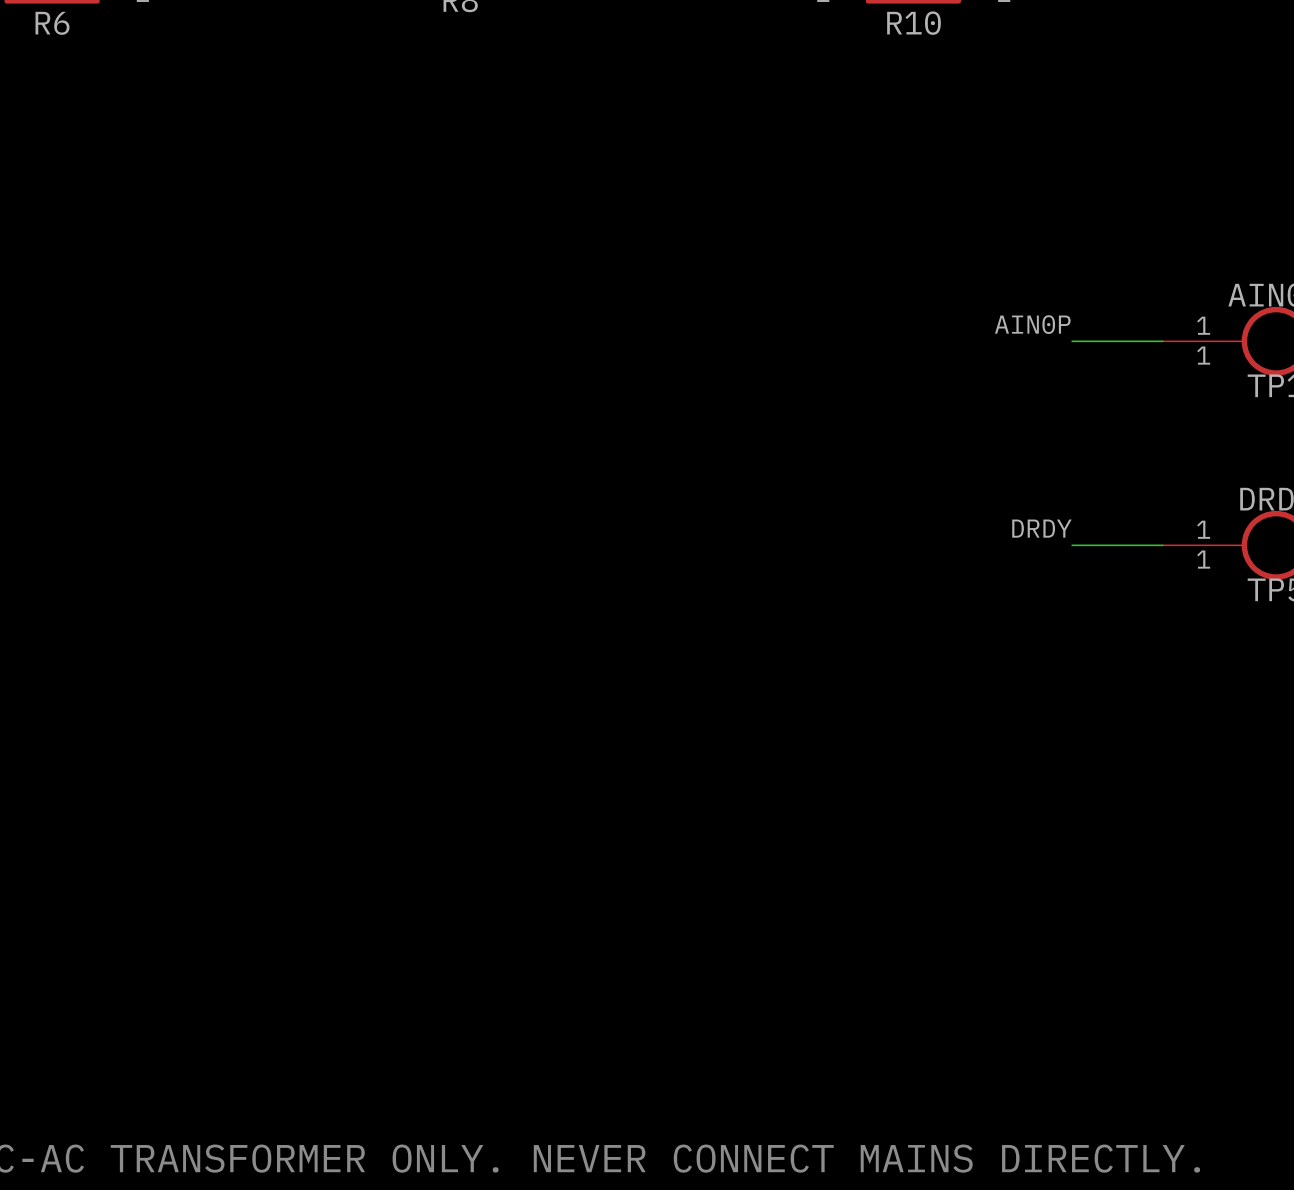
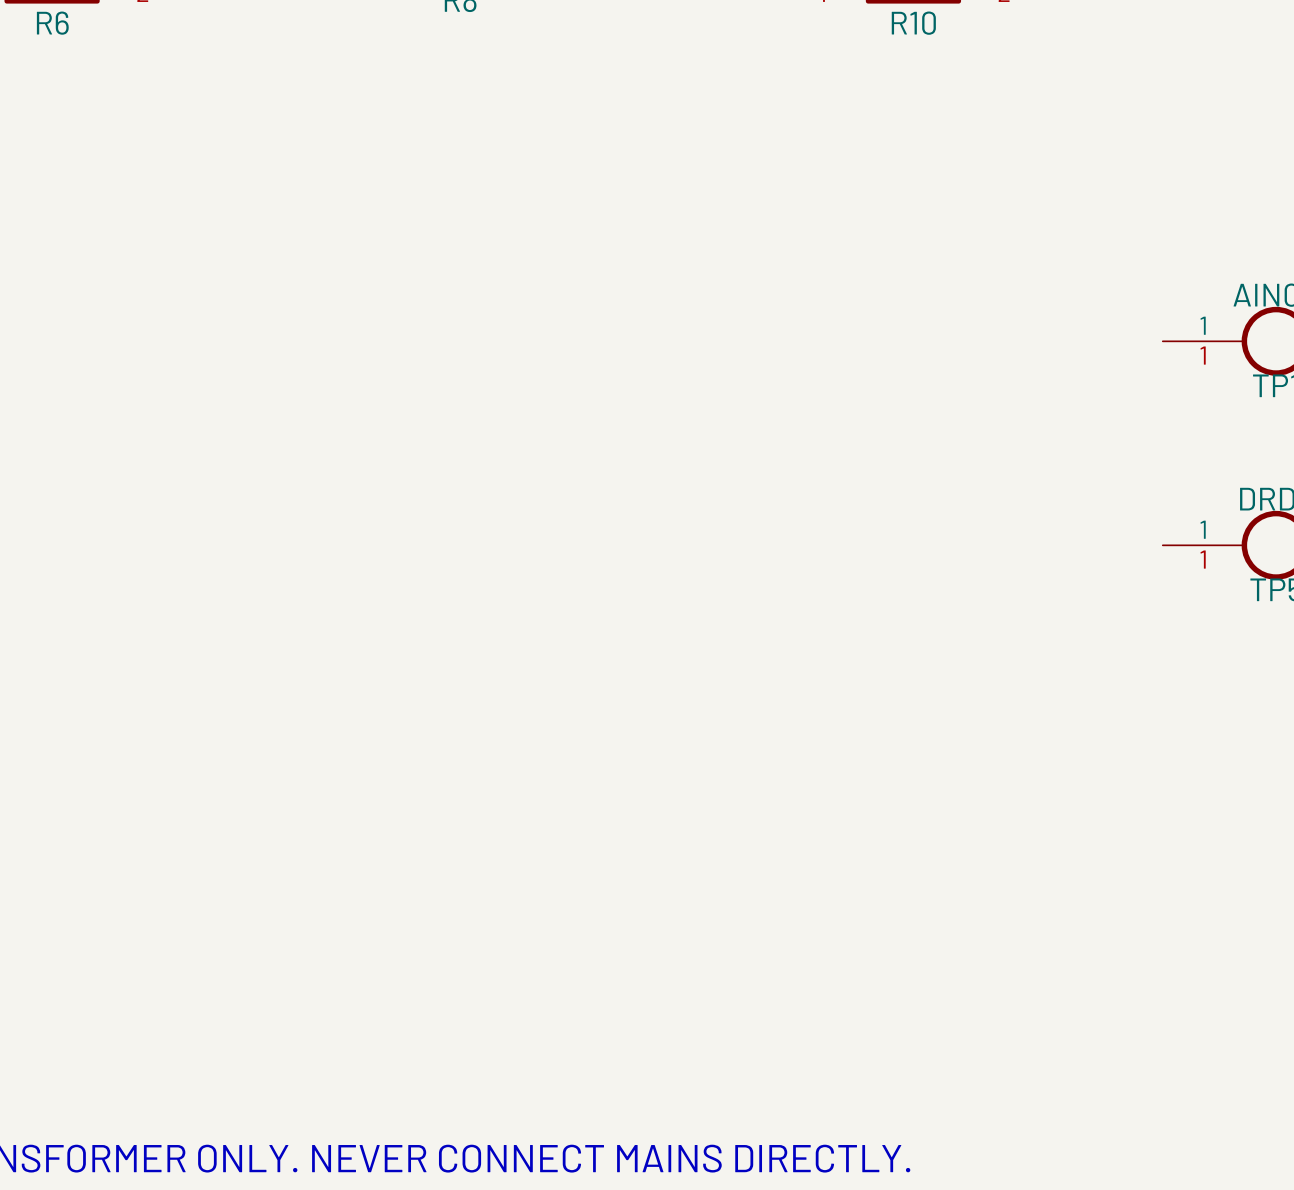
label: AIN0P (1032, 324) -> none
wire: (1072, 341) (1162, 341) -> none
label: DRDY (1041, 528) -> none
wire: (1072, 545) (1162, 545) -> none

